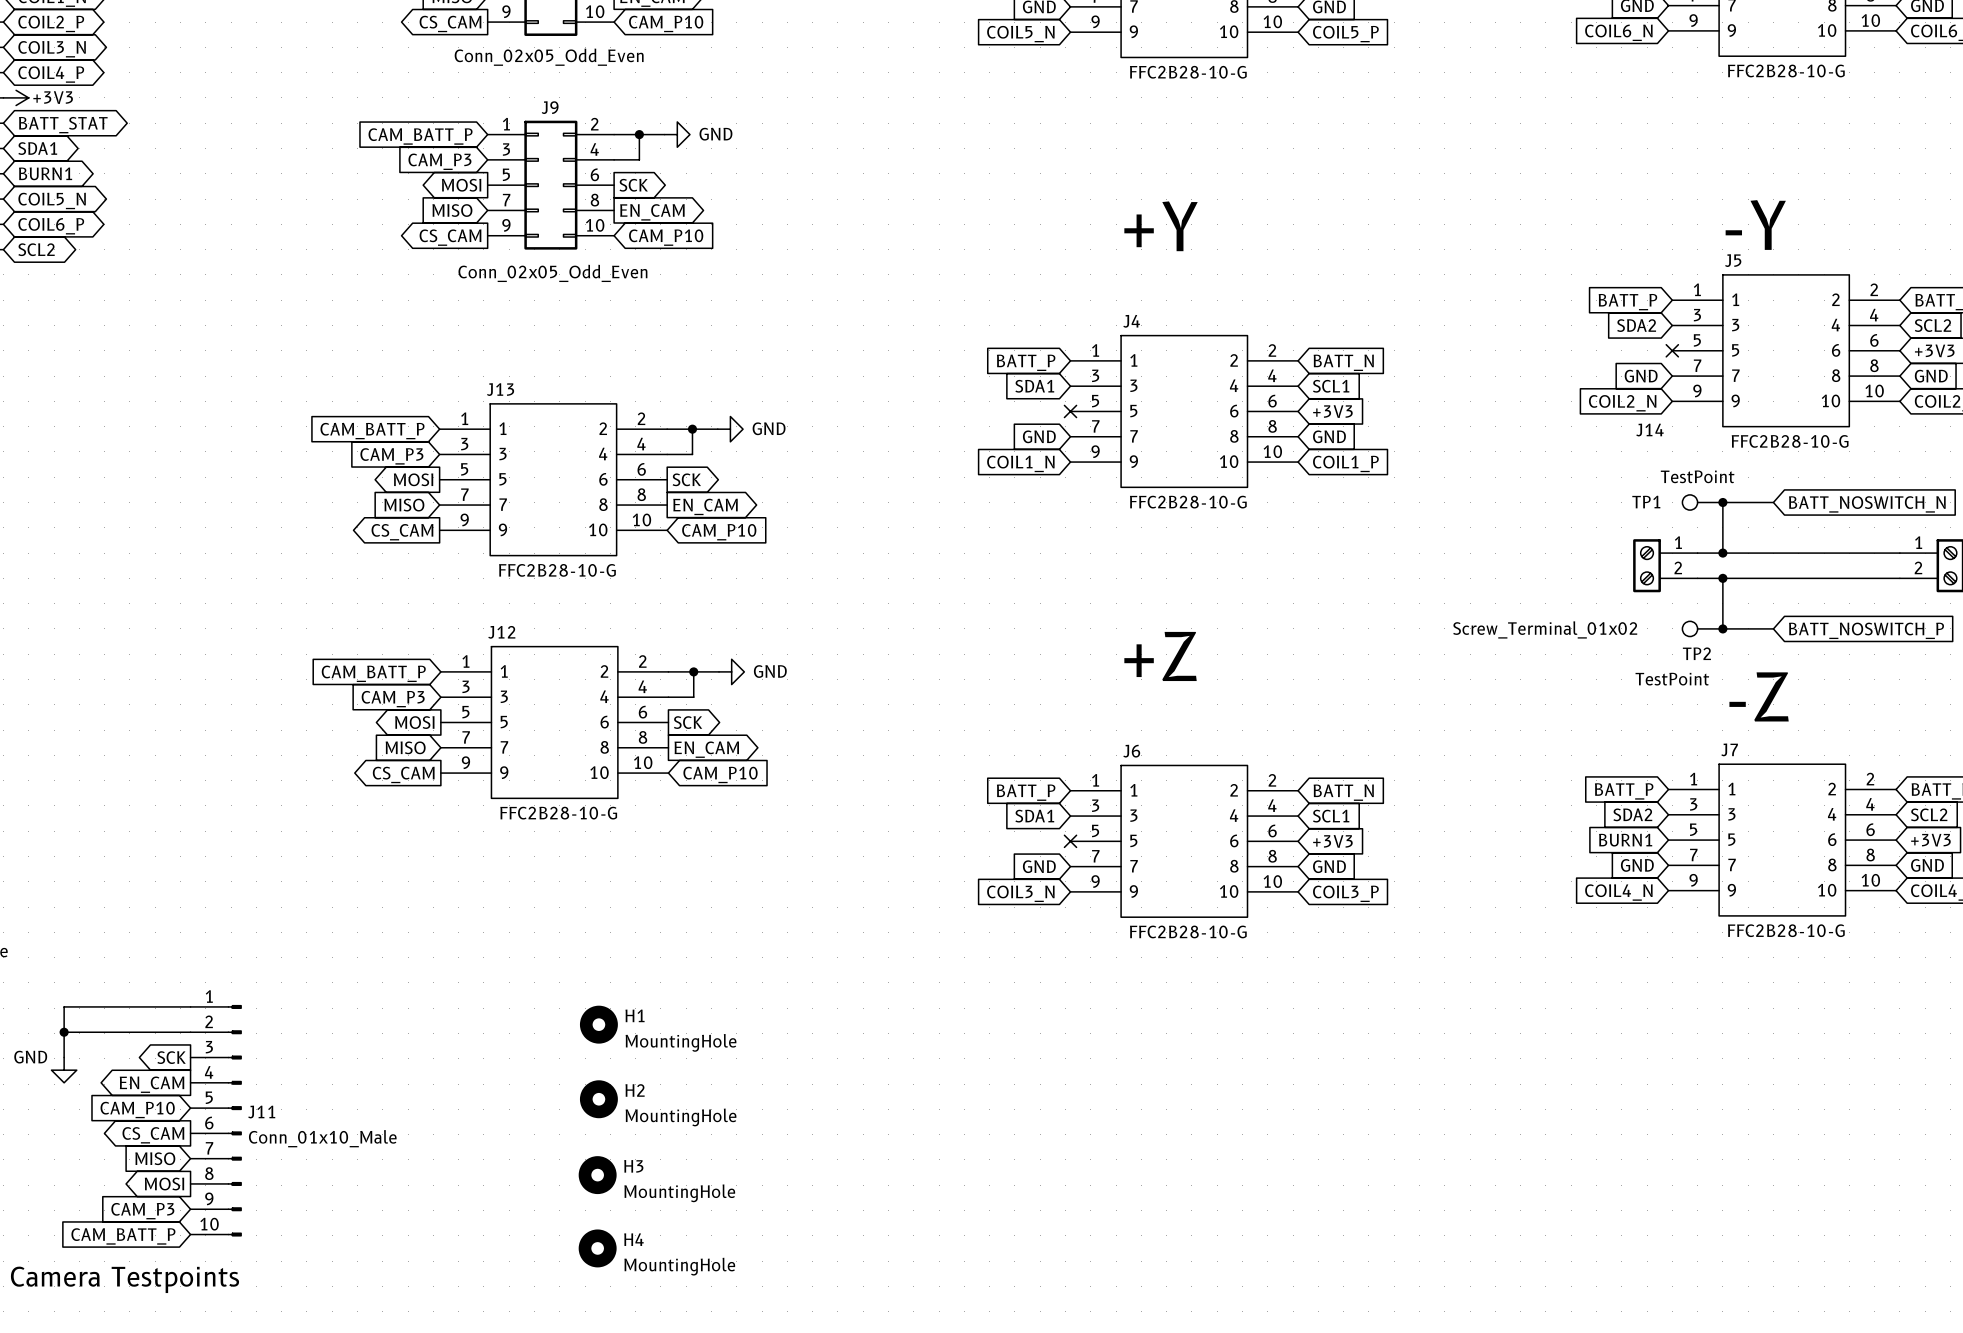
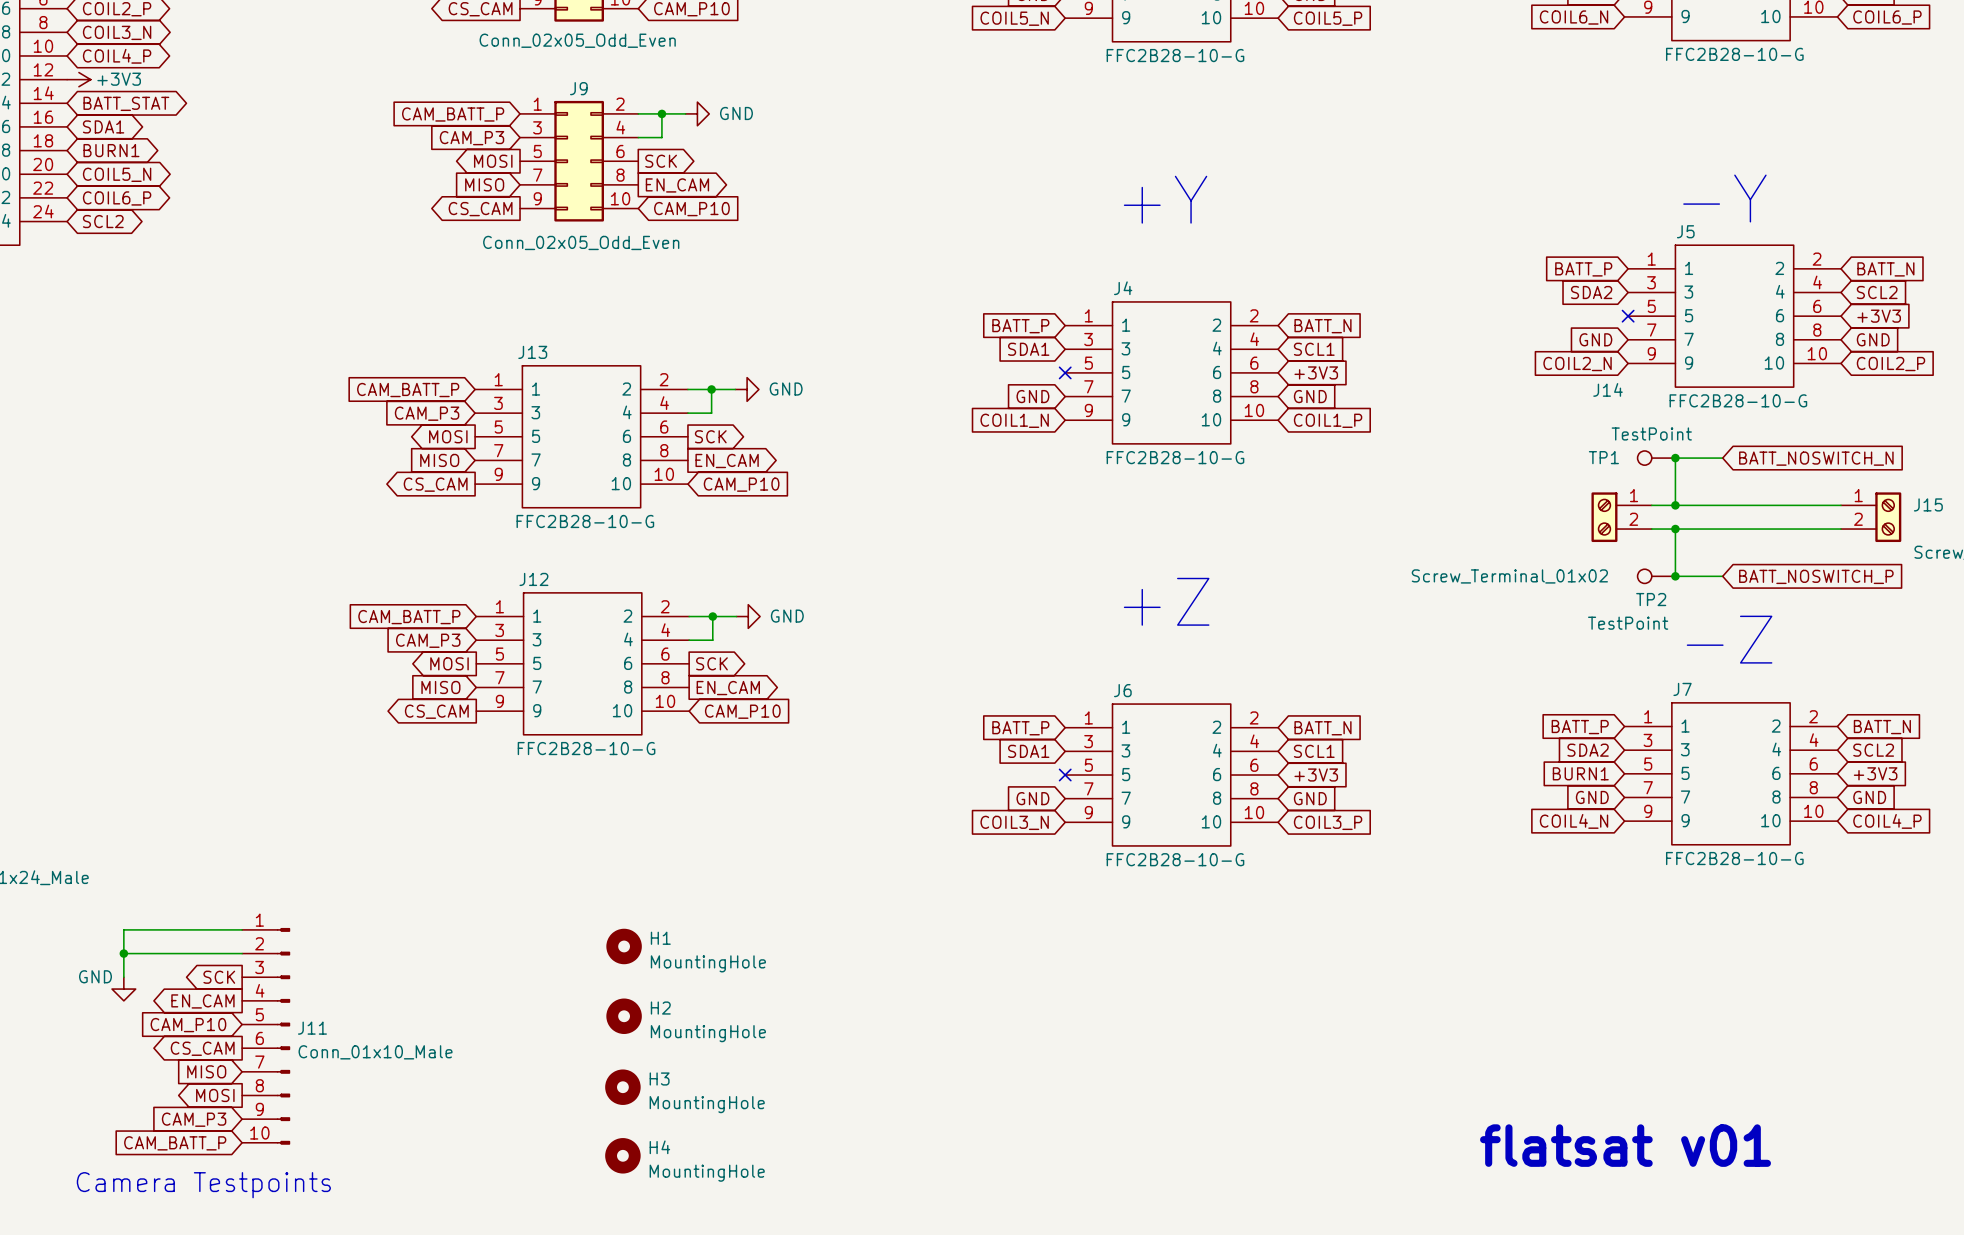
text: none -> flatsat v01 (1625, 1145)

